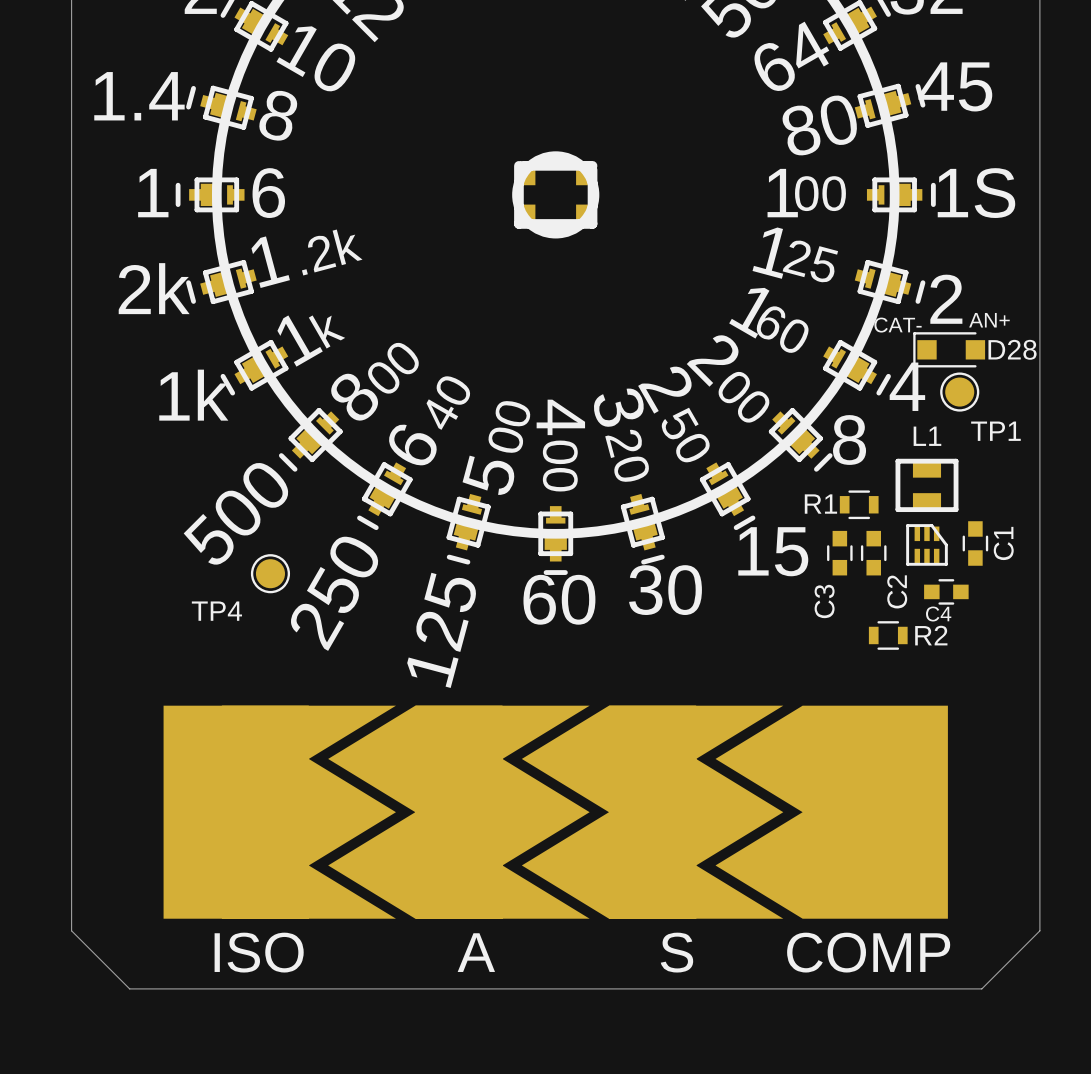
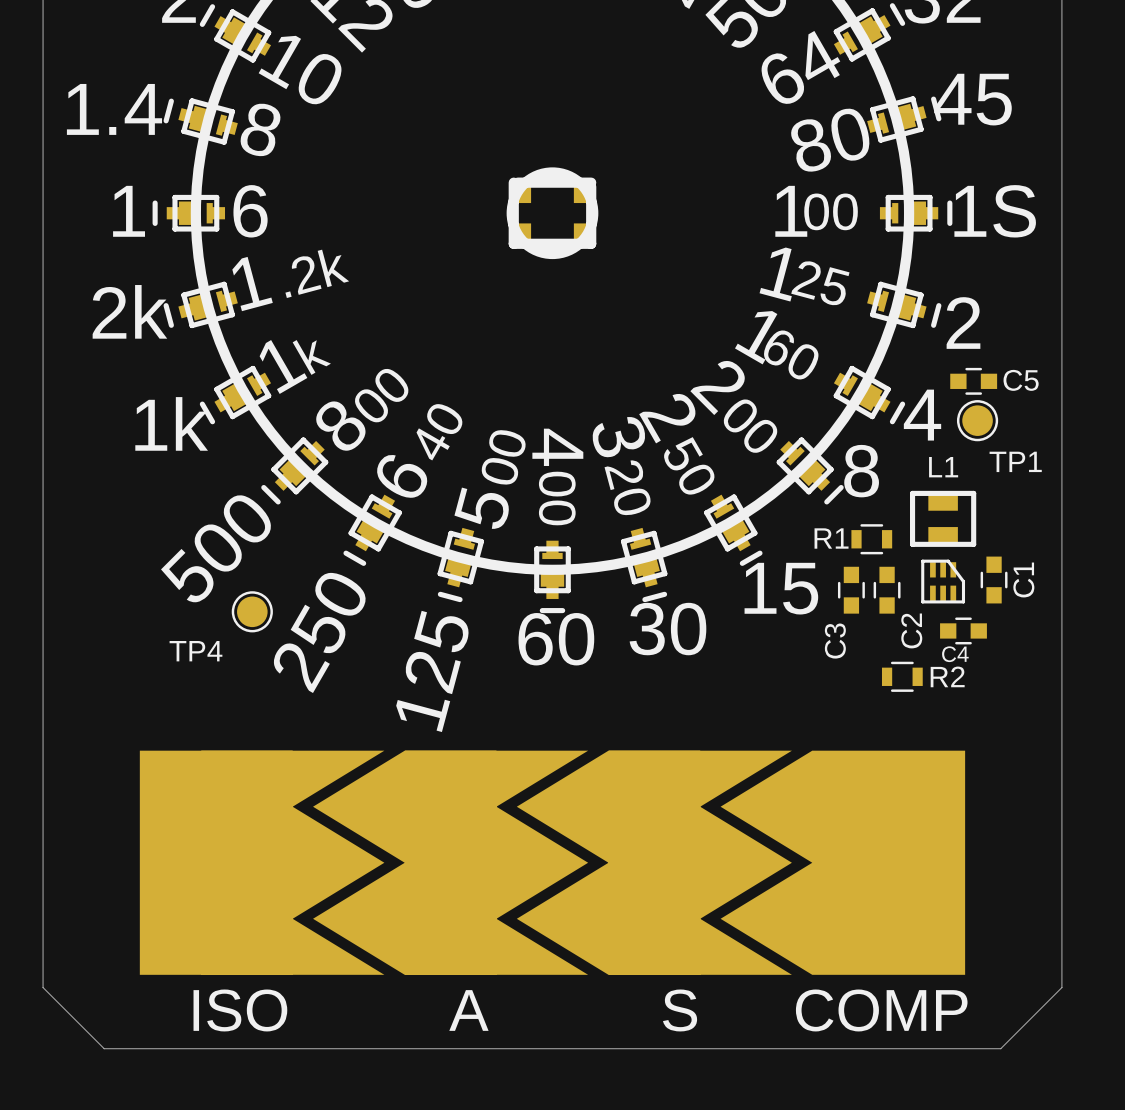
text: AN+ (989, 320) -> none
text: CAT- (898, 325) -> none
D28: (949, 349) -> none
C5: none -> (973, 381)

